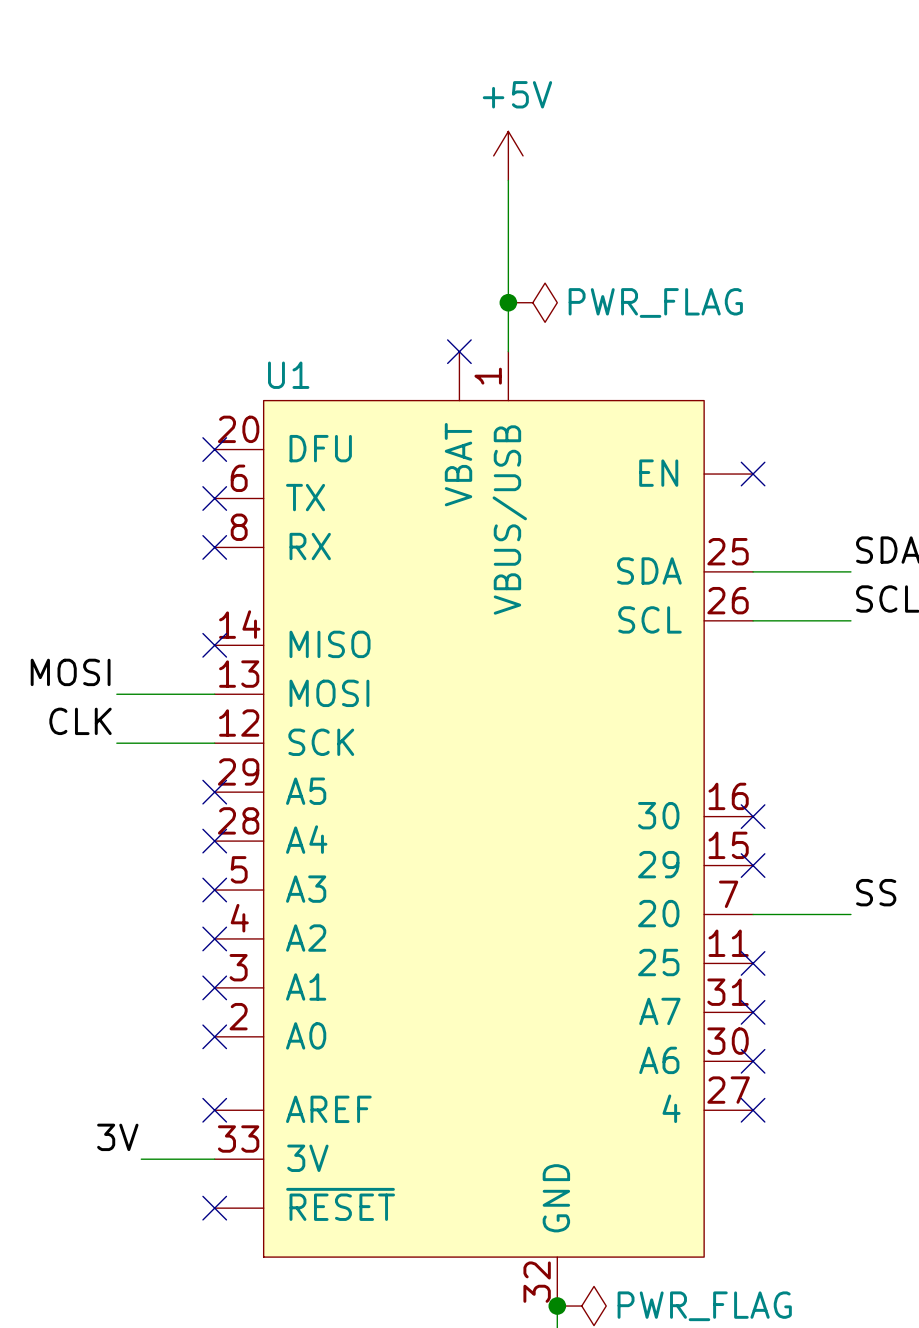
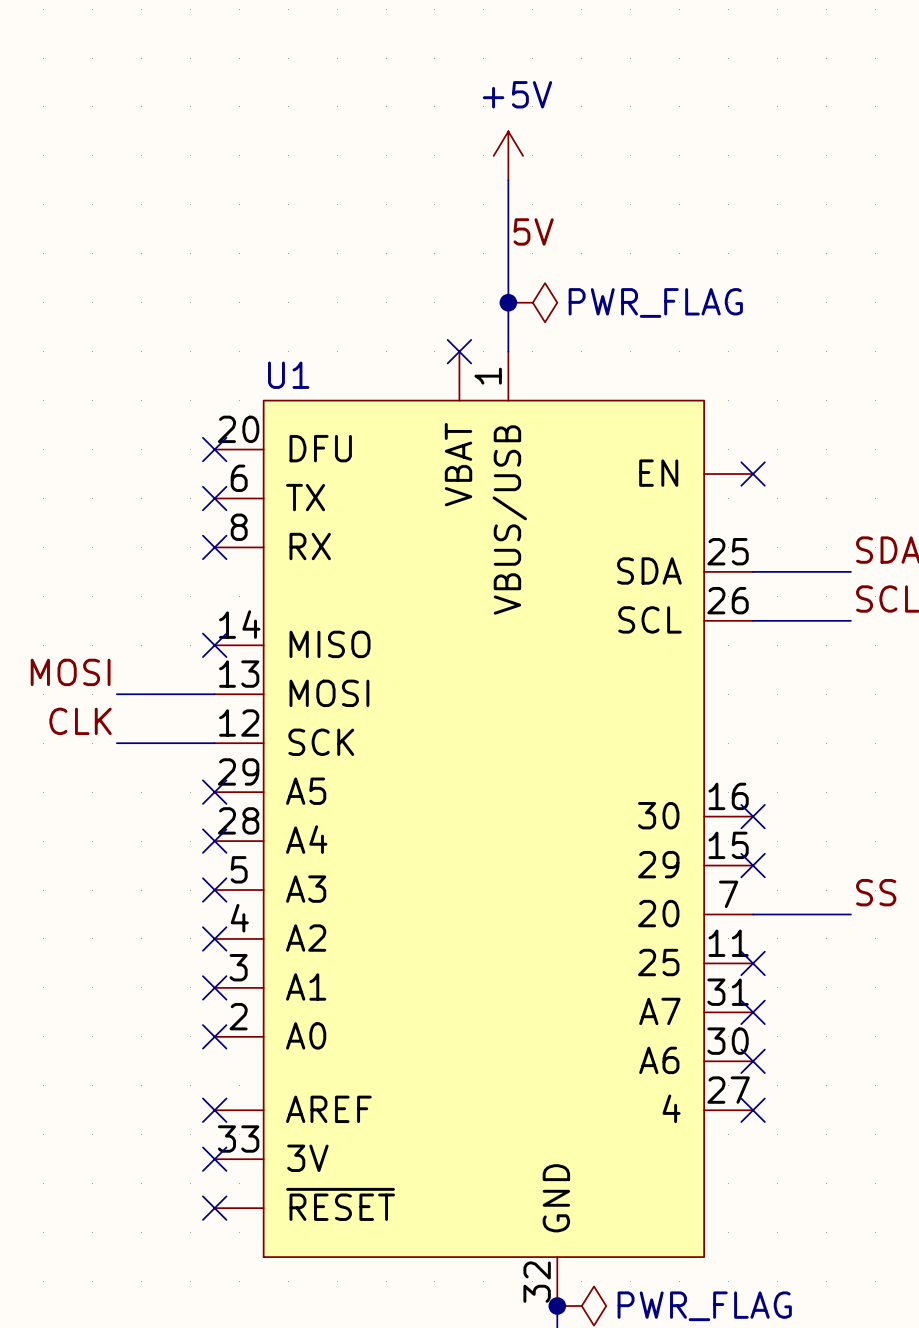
label: none -> 5V (533, 231)
label: 3V (117, 1137) -> none
wire: (141, 1159) (214, 1159) -> none
no-connect mark: none -> (214, 1159)

